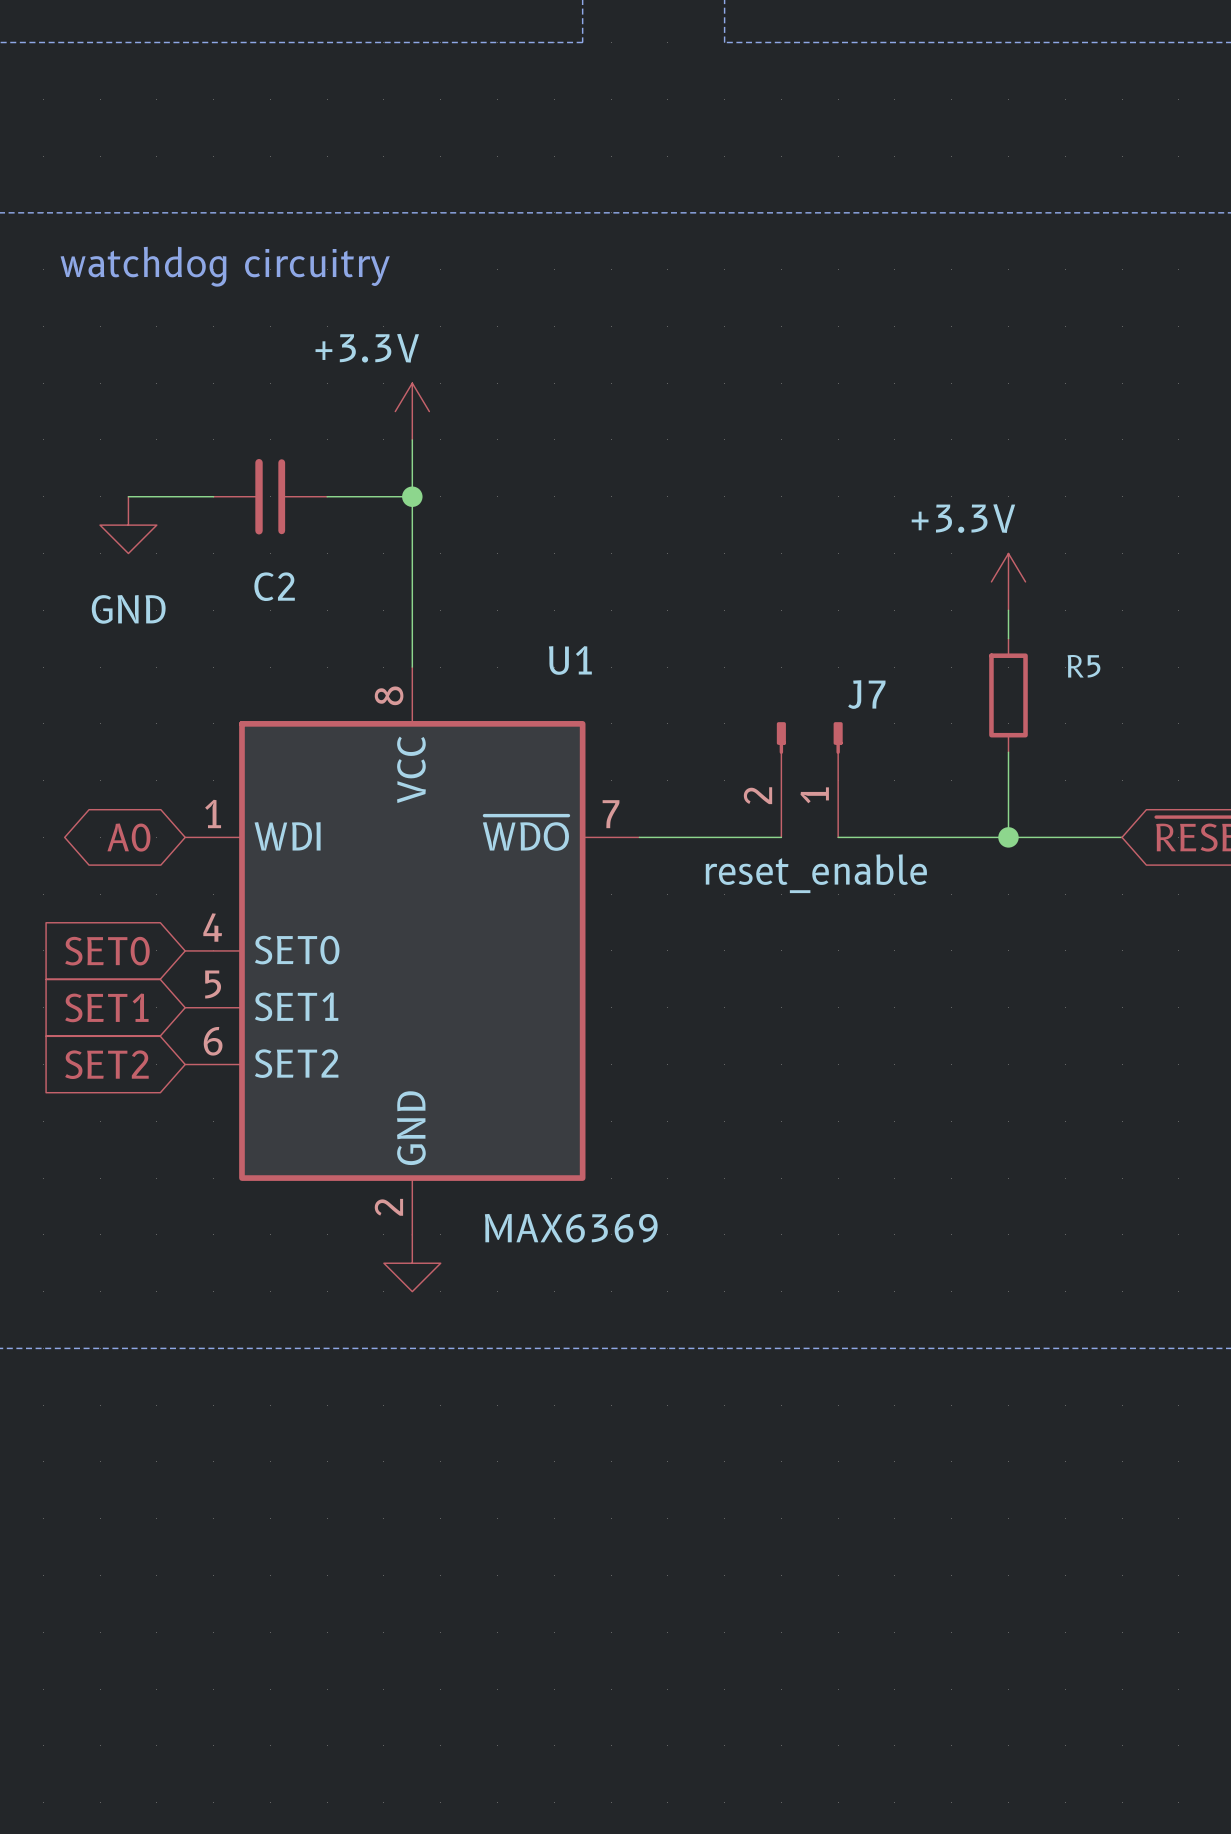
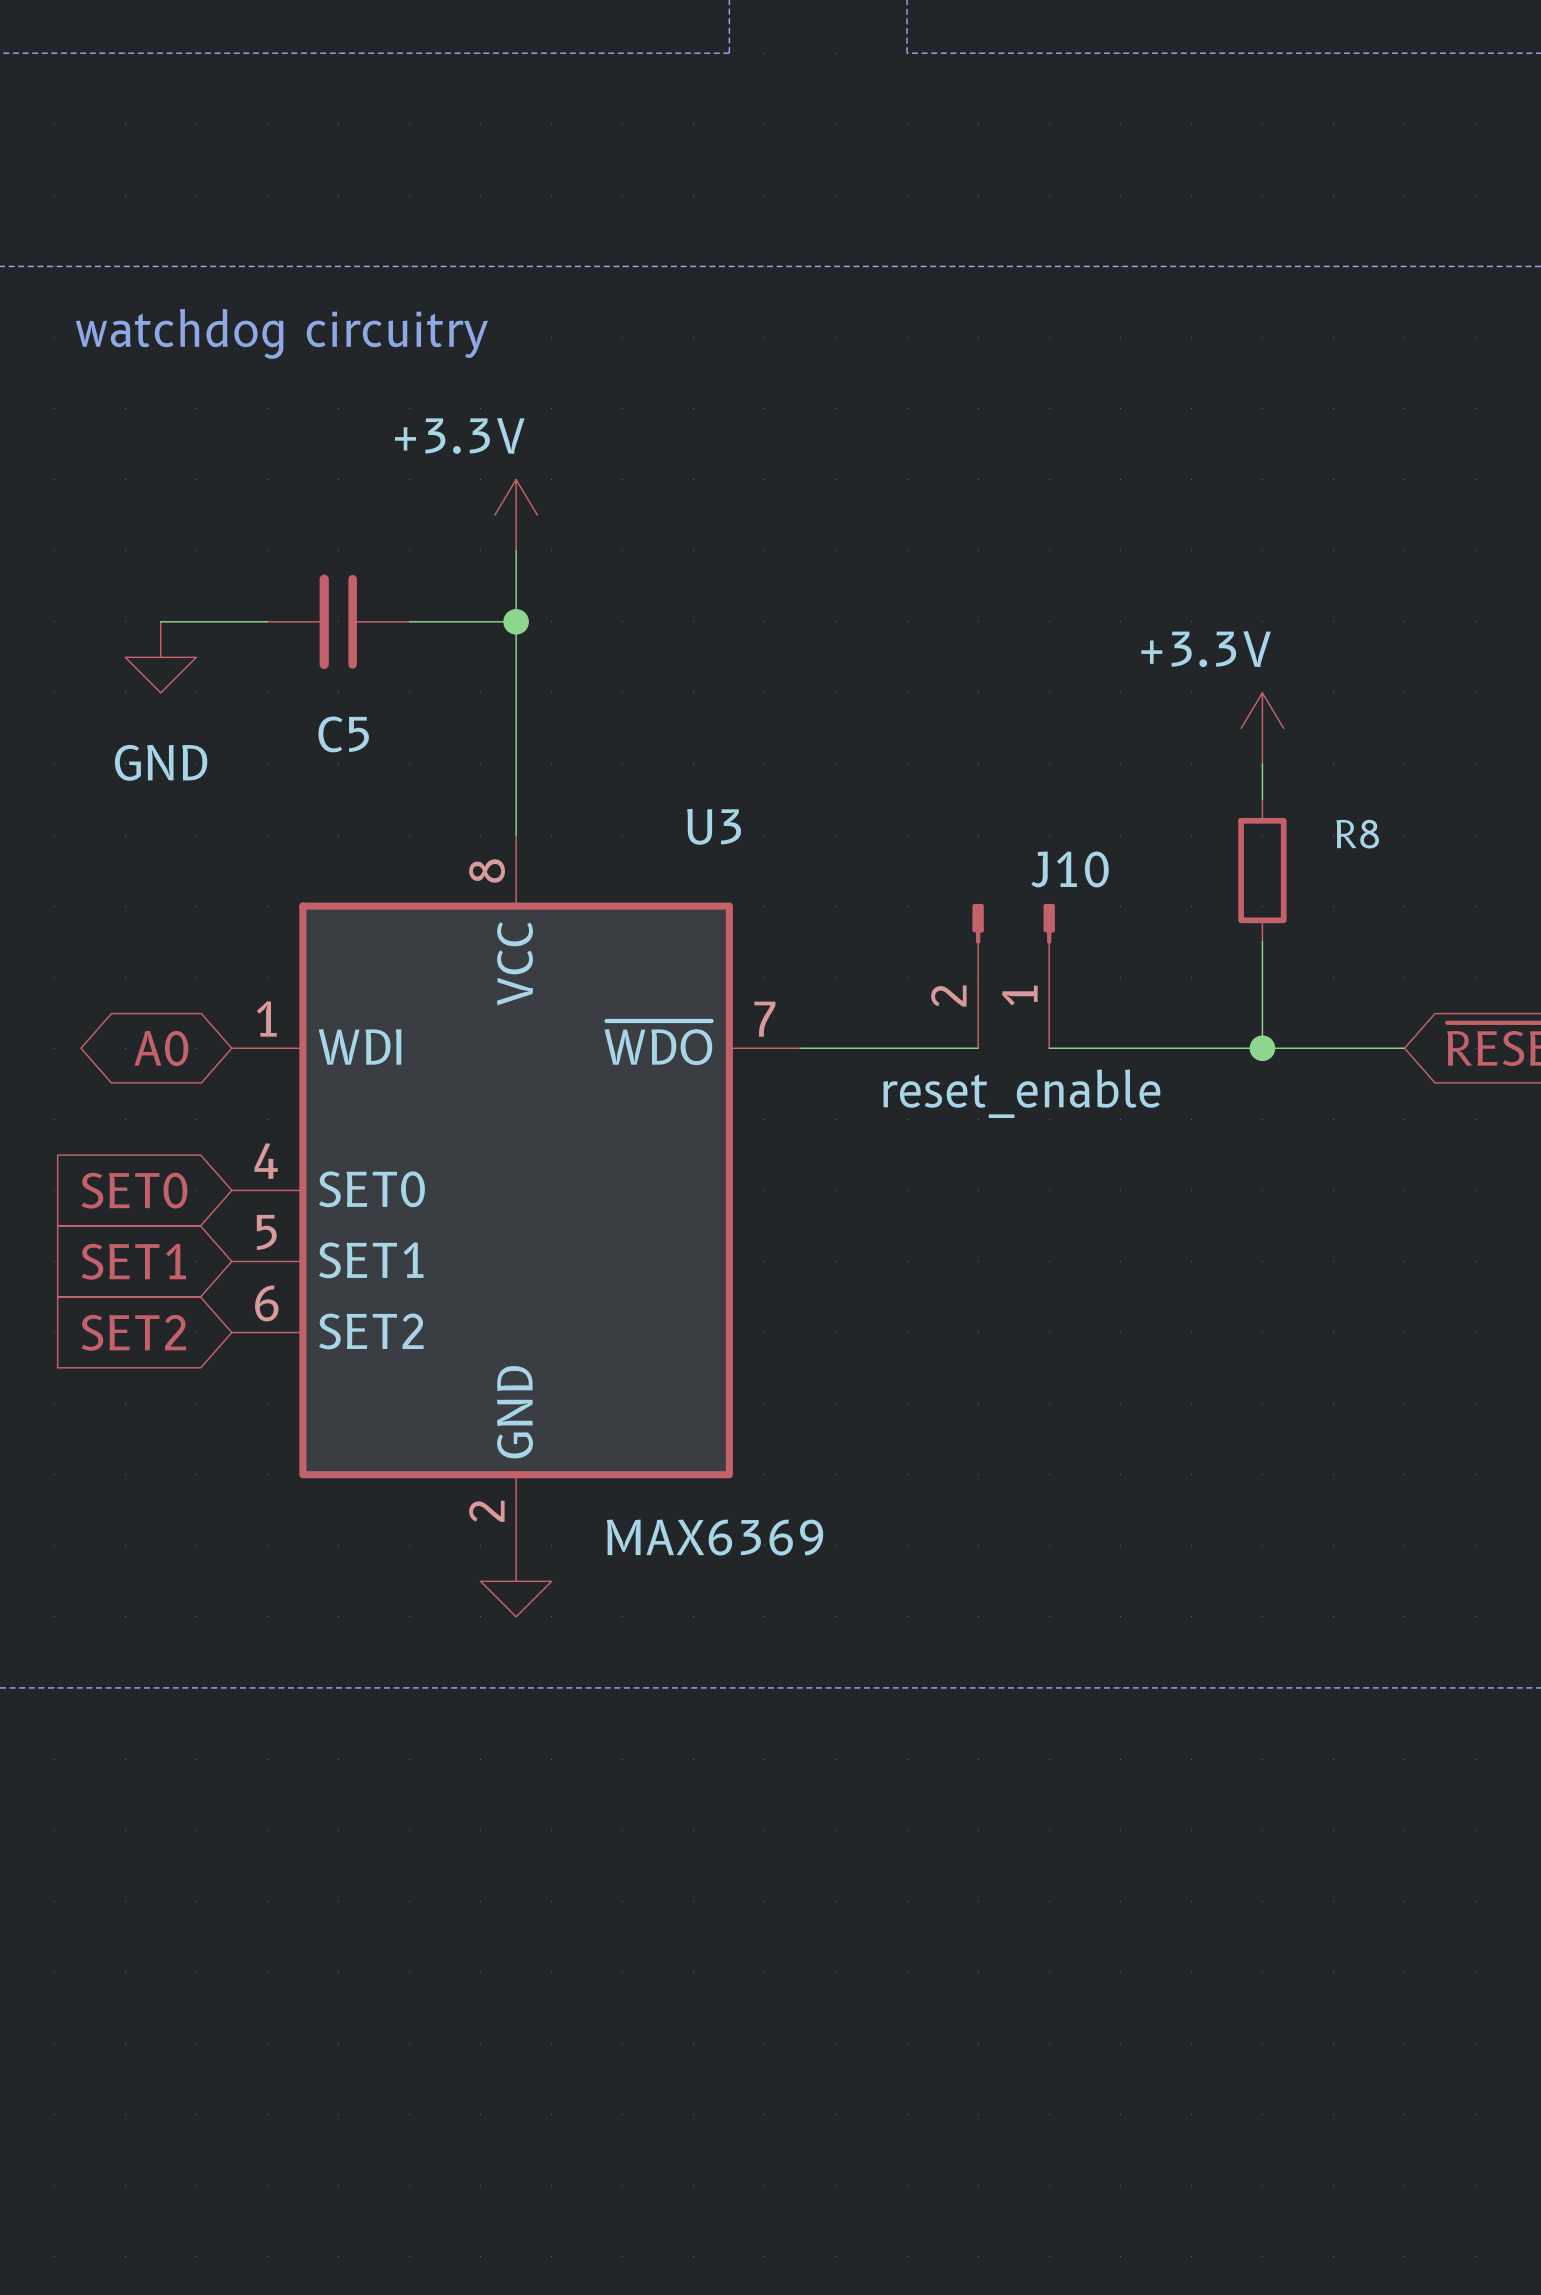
C2 name: C2 (274, 586) -> C5 (343, 734)
U1 name: U1 (570, 660) -> U3 (714, 826)
R5 name: R5 (1083, 666) -> R8 (1357, 834)
J7 name: J7 (866, 694) -> J10 (1070, 869)

